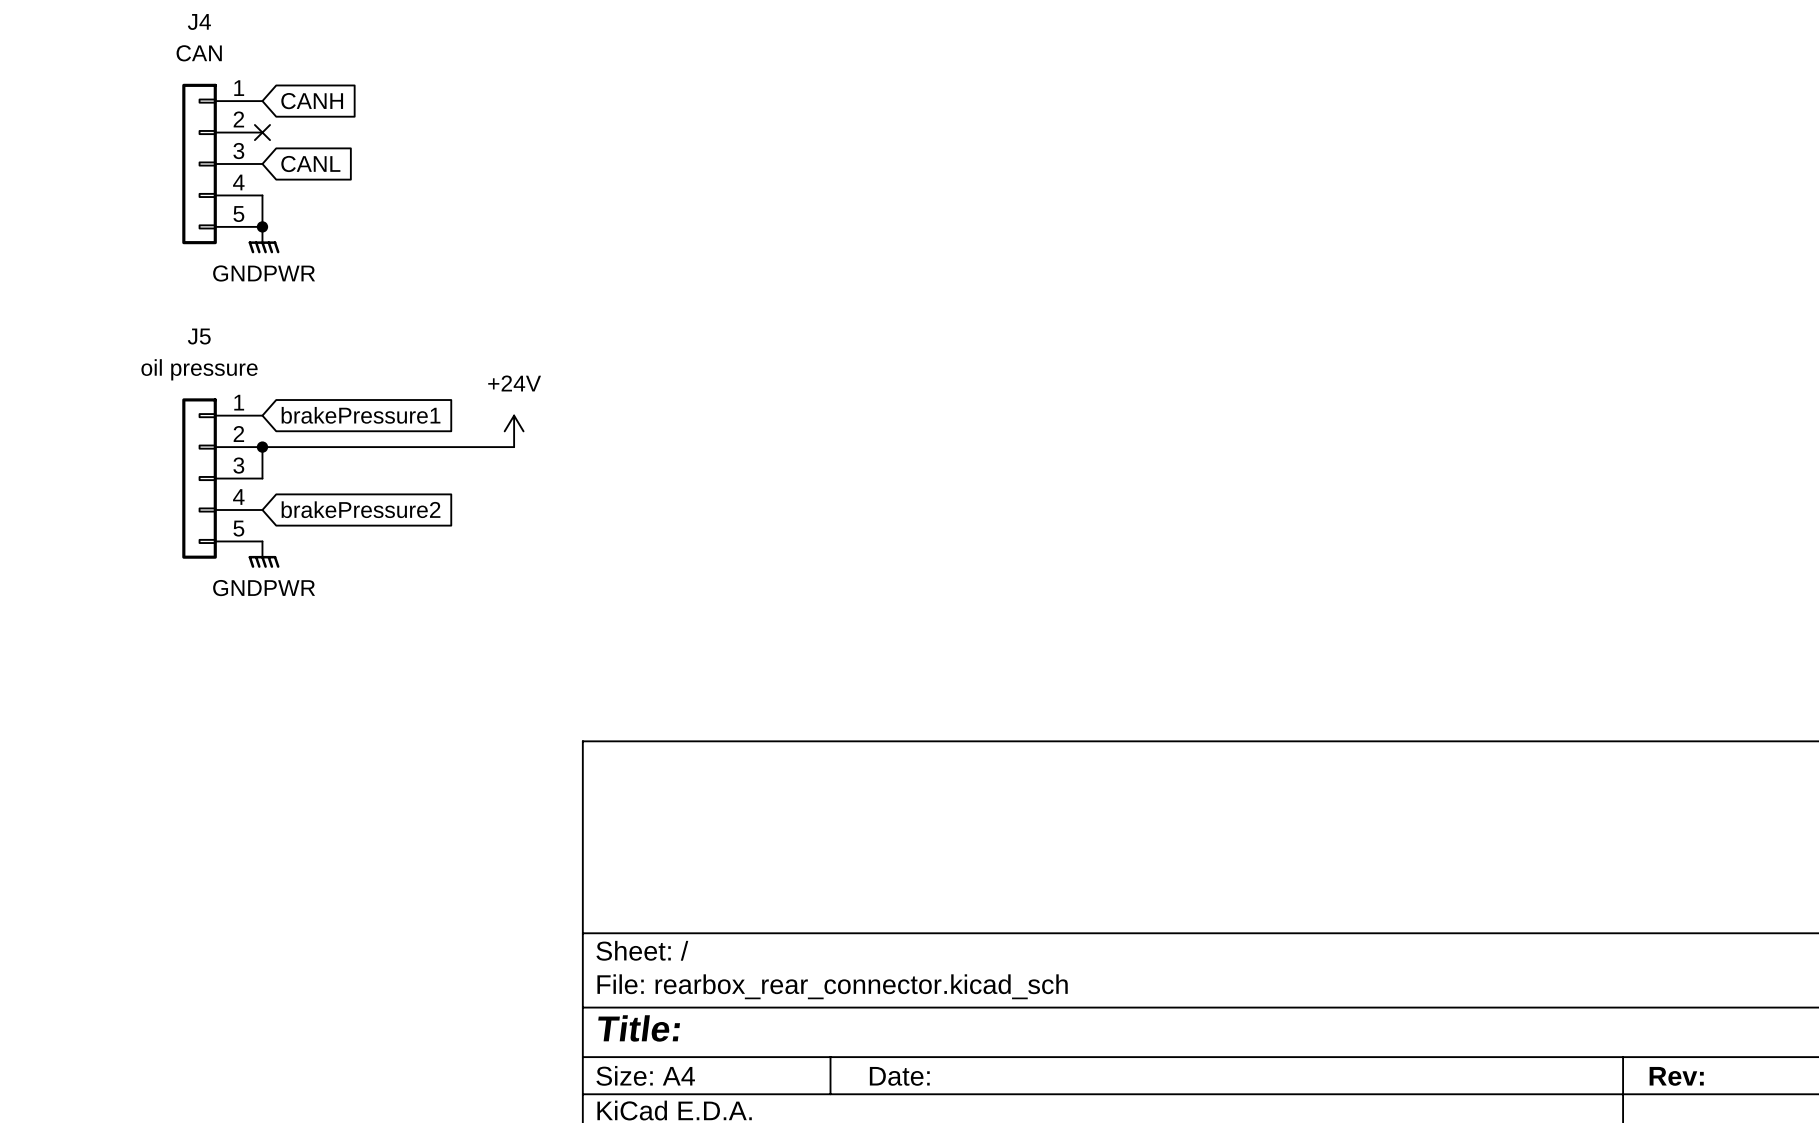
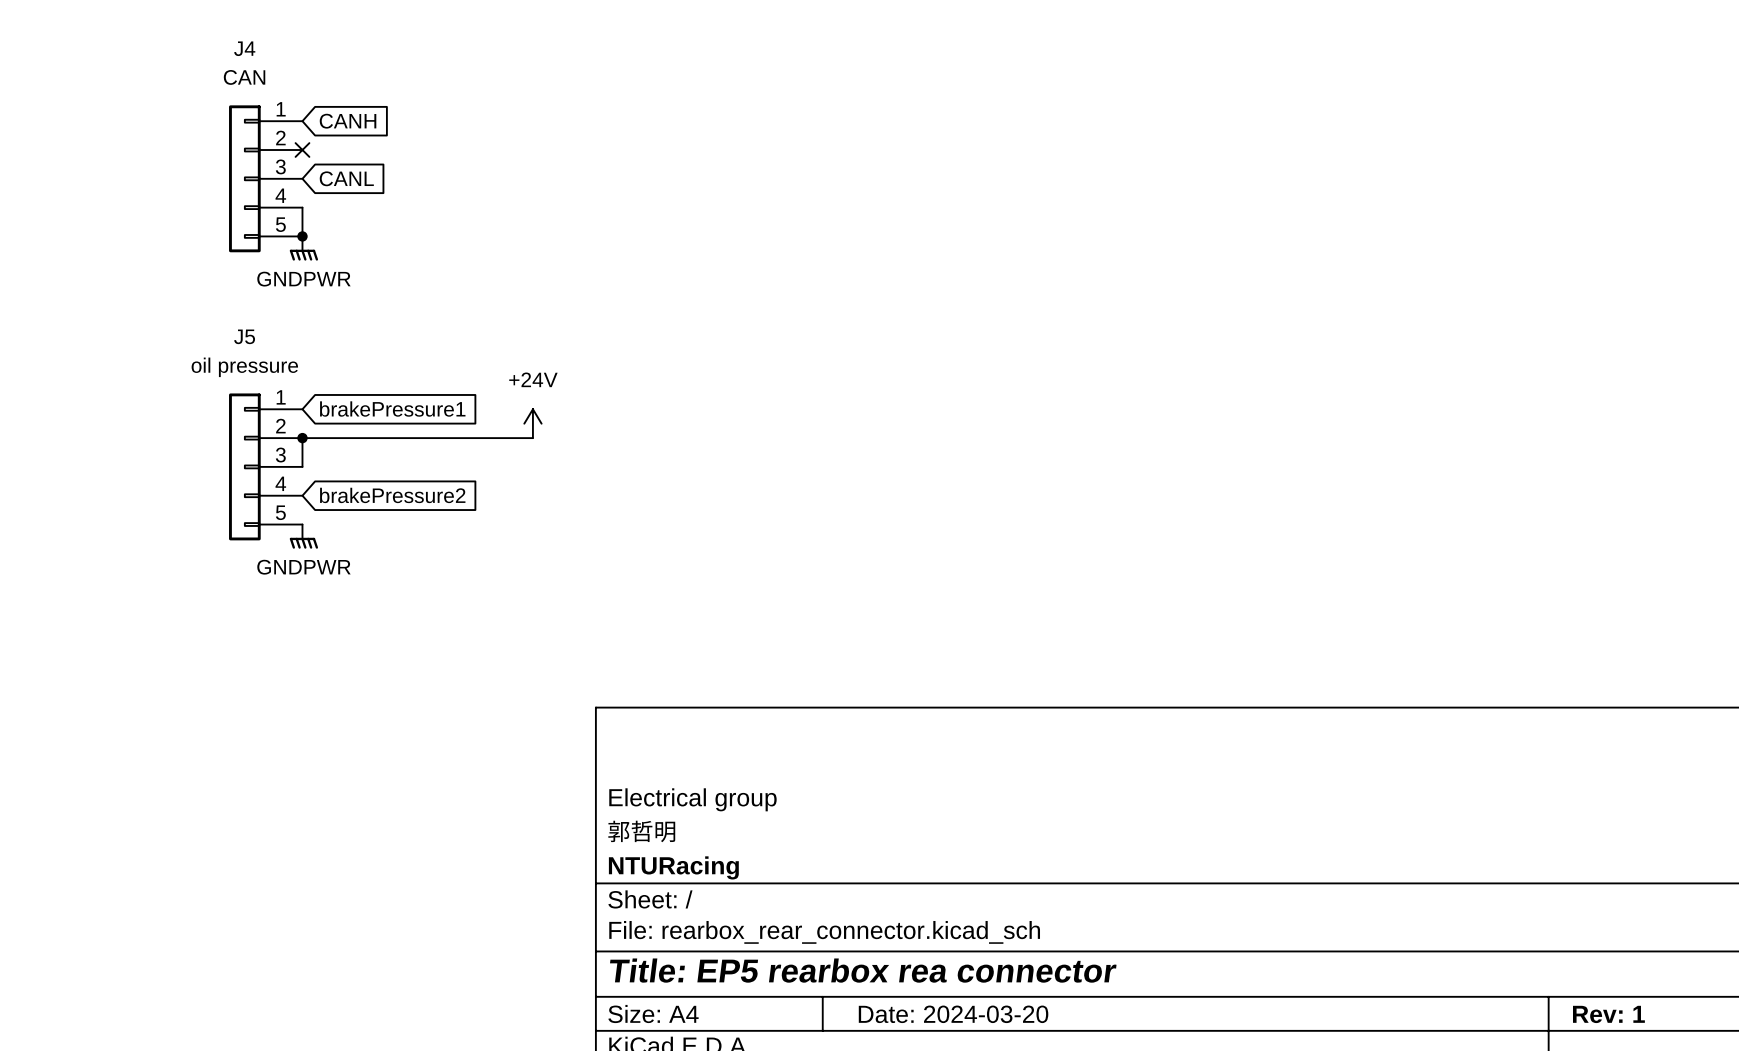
title block: none -> Electrical group (692, 799)
title block: none -> 郭哲明 (641, 831)
title block: none -> NTURacing (673, 867)
title block: Title: (639, 1028) -> Title: EP5 rearbox rea connector (863, 970)
title block: Date: (899, 1076) -> Date: 2024-03-20 (953, 1014)
title block: Rev: (1676, 1076) -> Rev: 1 (1608, 1014)

